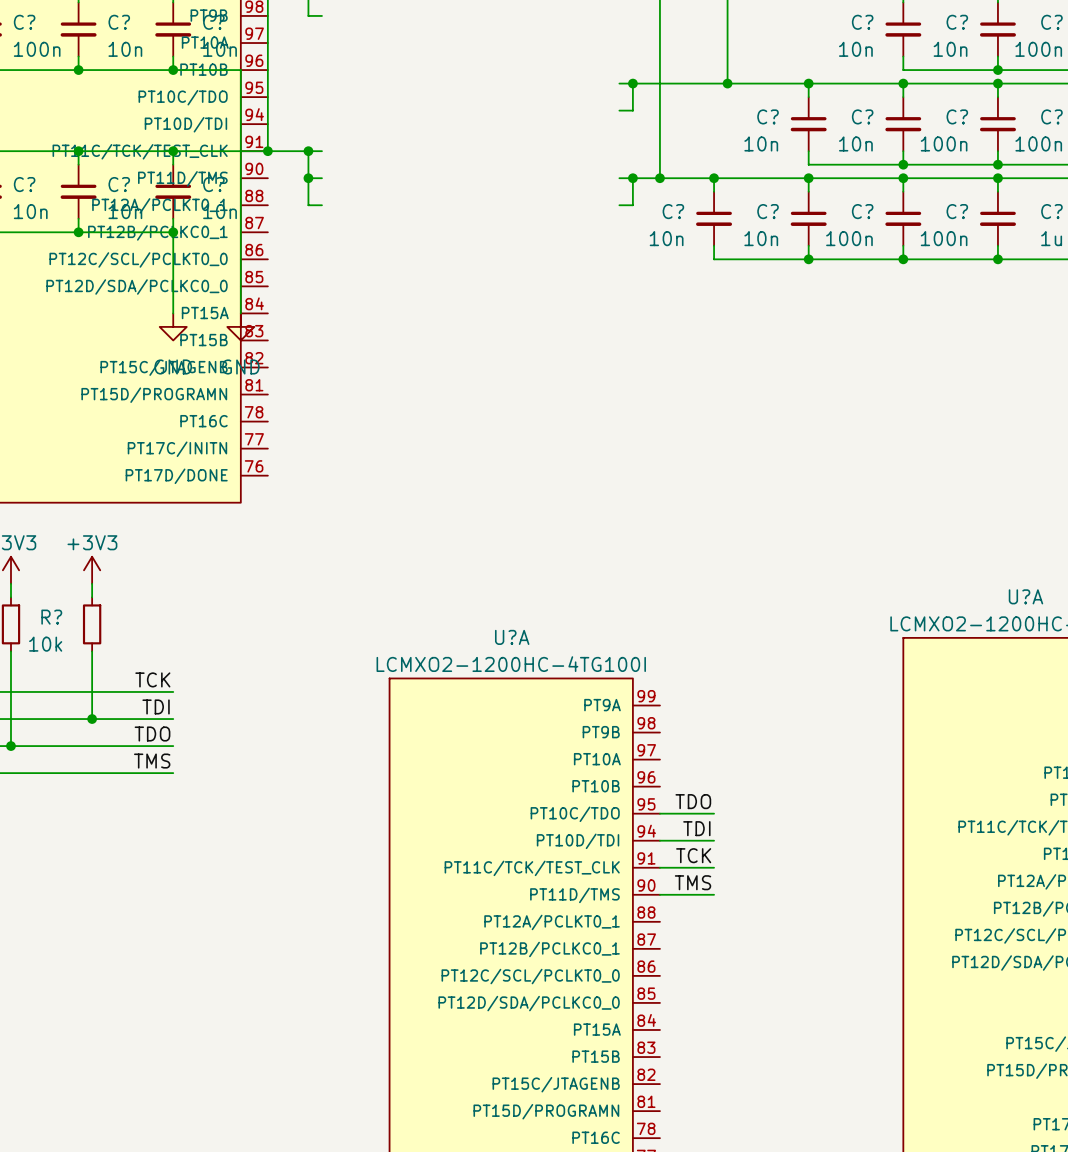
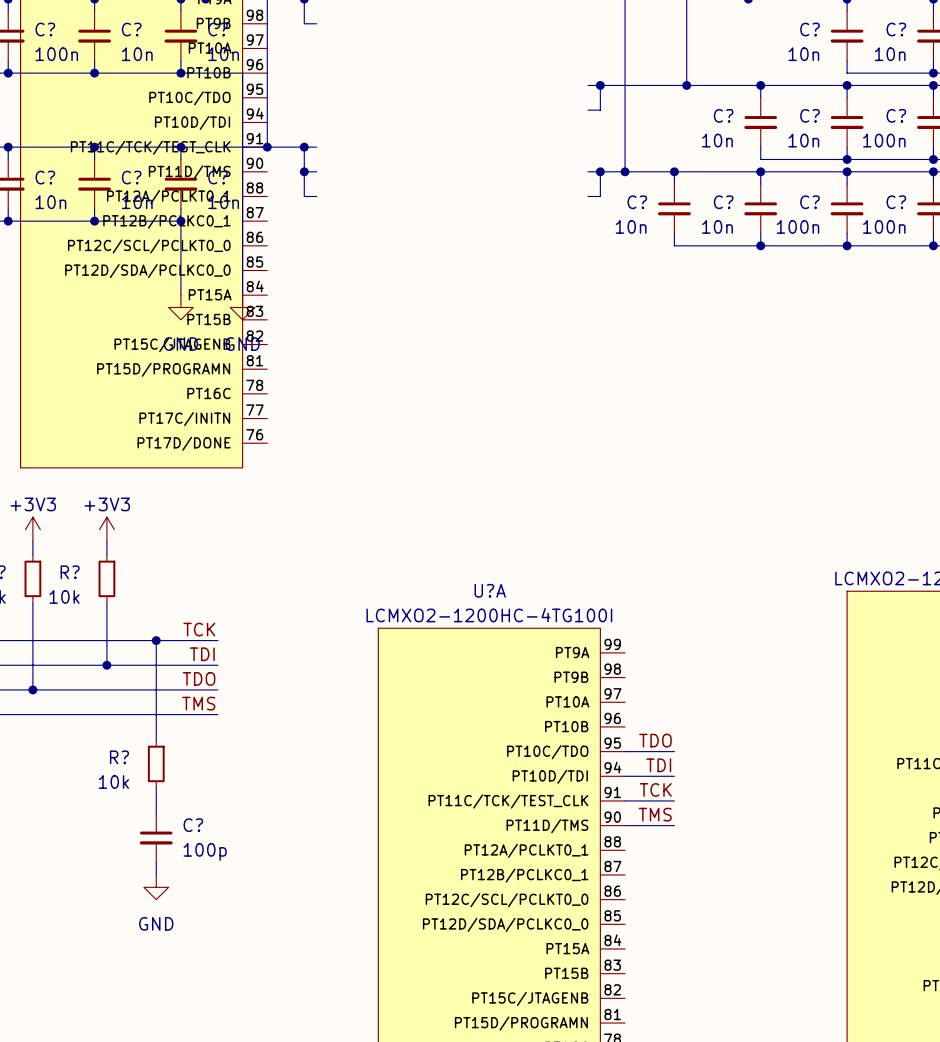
label position: TCK (152, 679) -> TCK (199, 629)
wire: none -> (156, 640) (156, 739)
junction: none -> (156, 640)
wire: none -> (180, 640) (217, 640)
label position: TDI (156, 706) -> TDI (202, 654)
wire: none -> (180, 665) (217, 665)
label position: TDO (152, 734) -> TDO (199, 678)
wire: none -> (180, 689) (217, 689)
label position: TMS (152, 761) -> TMS (198, 703)
wire: none -> (180, 714) (217, 714)
R?: none -> 10k (156, 763)
wire: none -> (156, 788) (156, 813)
C?: none -> 100p (156, 837)
wire: none -> (156, 862) (156, 874)
power symbol: none -> GND (156, 887)

